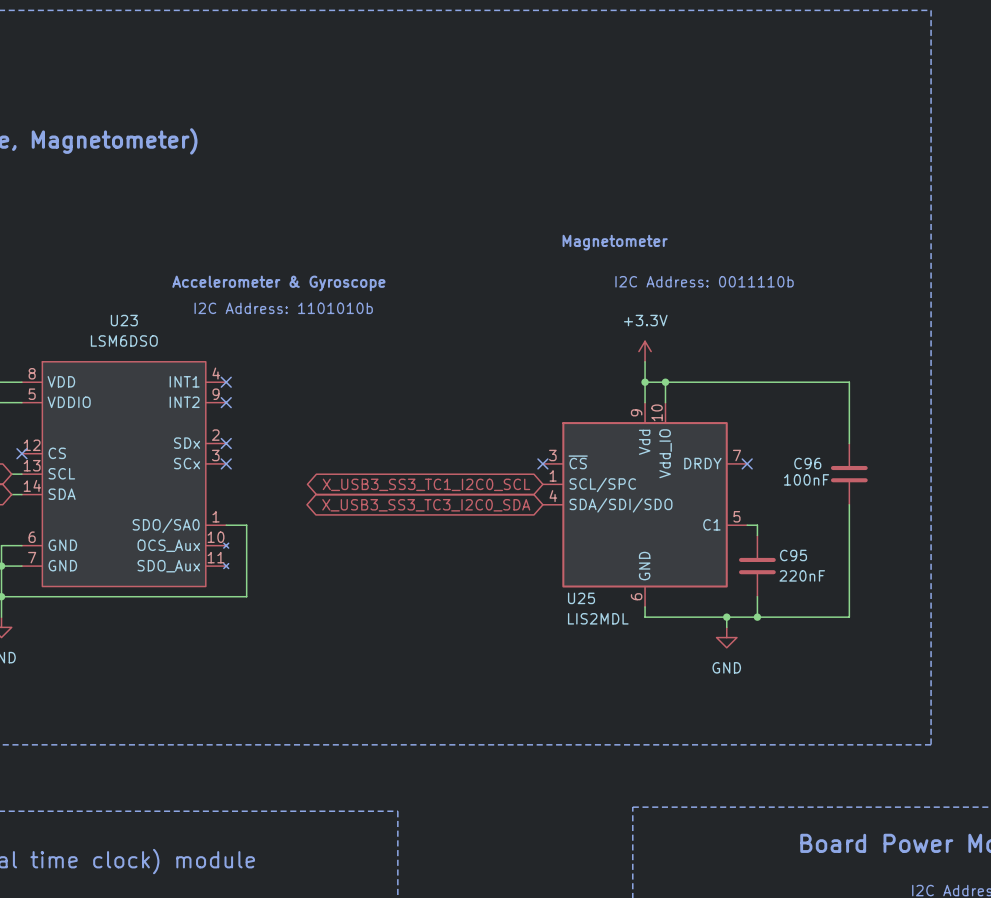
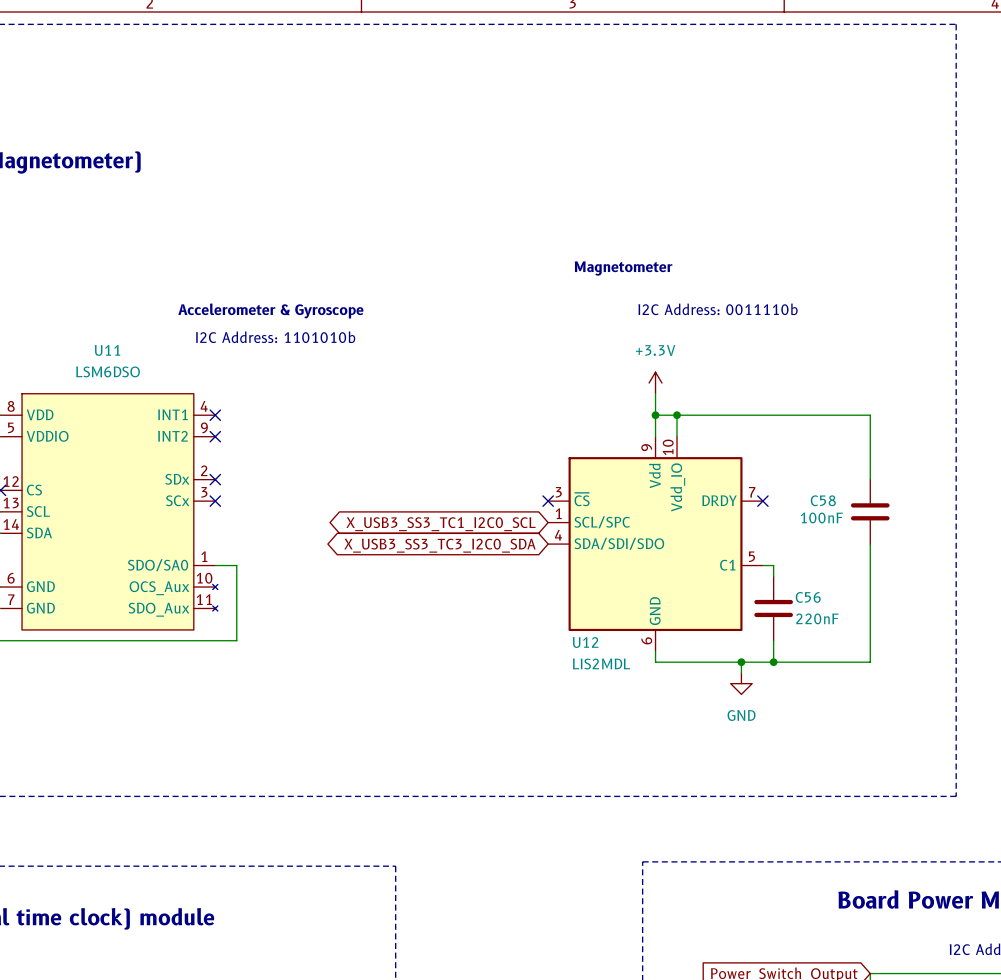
U23 name: U23 (124, 320) -> U11 (107, 350)
C96 name: C96 (807, 463) -> C58 (823, 500)
C95 name: C95 (793, 555) -> C56 (808, 597)
U25 name: U25 (581, 598) -> U12 (585, 642)

